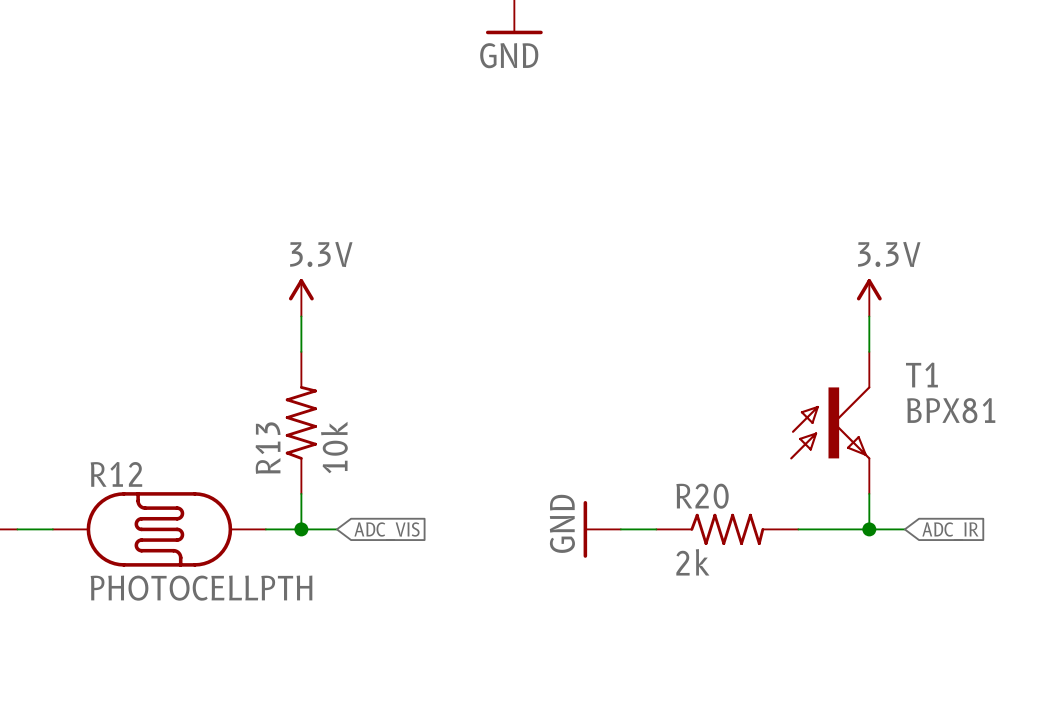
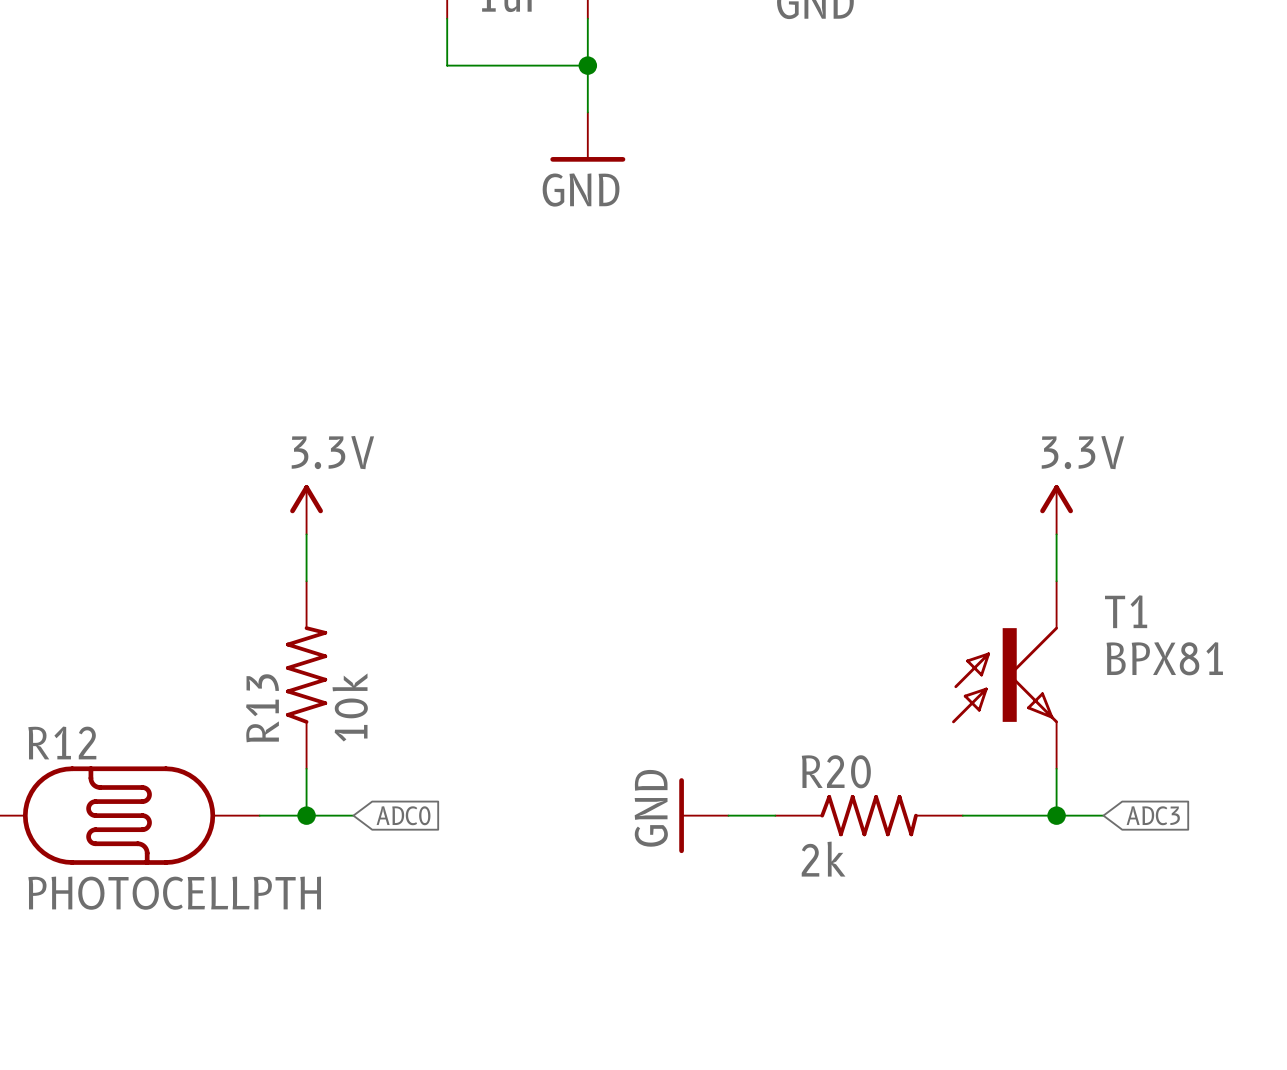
global label: ADC_VIS (387, 531) -> ADC0 (403, 815)
global label: ADC_IR (950, 531) -> ADC3 (1153, 815)

